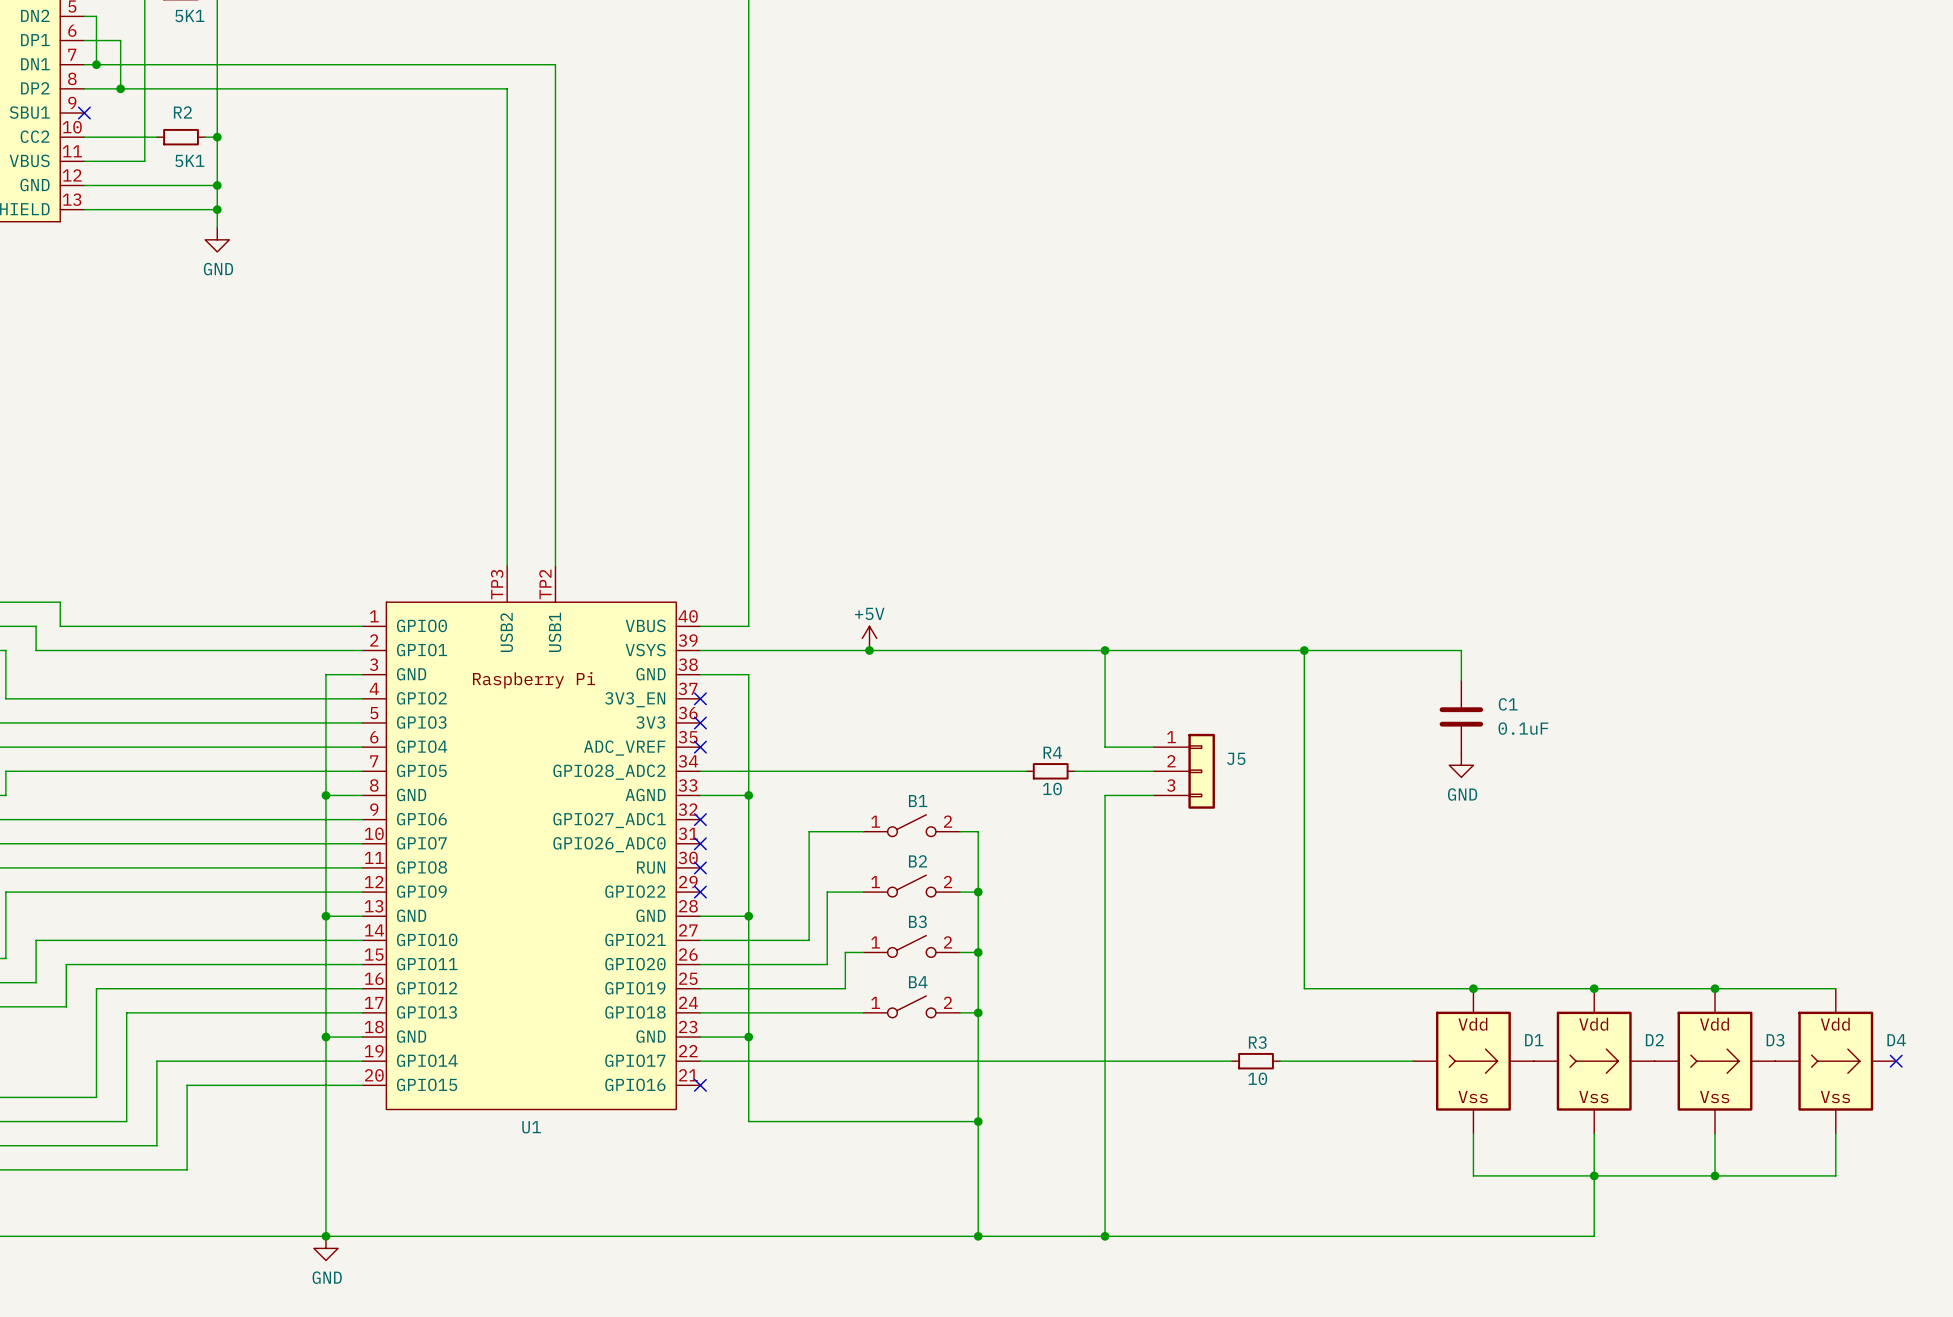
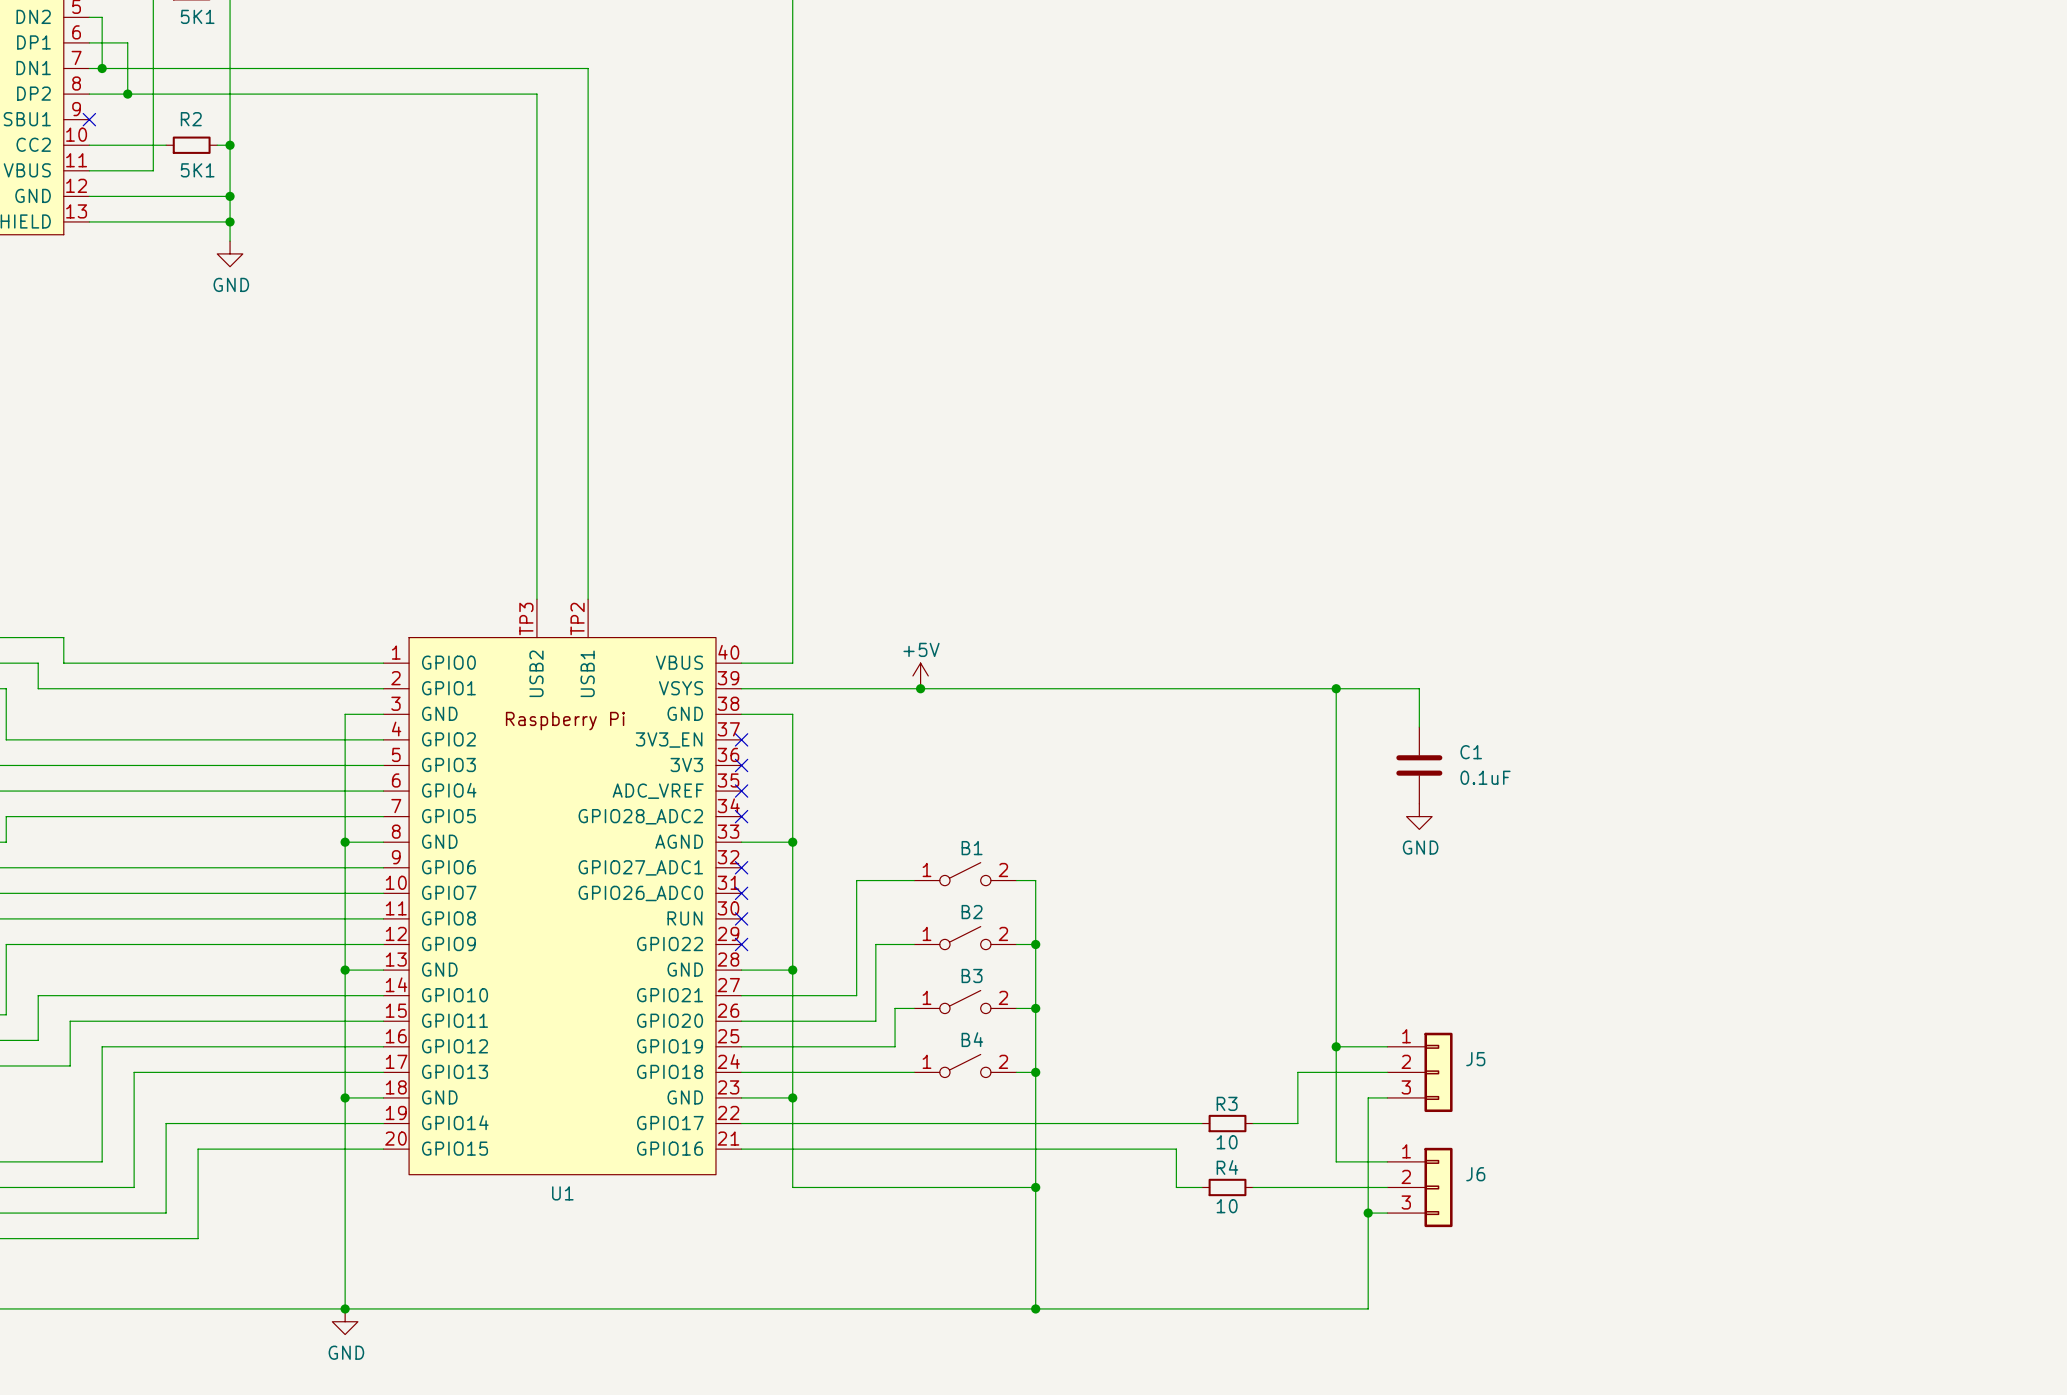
wire: (1105, 650) (1105, 747) (1153, 747) -> none
junction: (1105, 650) -> none
wire: none -> (1336, 688) (1336, 1161) (1387, 1161)
wire: (1304, 650) (1304, 988) -> (1336, 1046) (1380, 1046)
junction position: (1304, 650) -> (1336, 688)
wire: (1340, 650) (1461, 650) (1461, 680) -> (1419, 688) (1419, 727)
C1 position: (1461, 716) -> (1419, 765)
power symbol position: GND (1461, 765) -> GND (1419, 816)
wire: (700, 771) (1026, 771) -> none
no-connect mark: none -> (741, 816)
R4 position: (1050, 771) -> (1227, 1187)
wire: (1074, 771) (1153, 771) -> none
J5 position: (1184, 771) -> (1419, 1072)
wire: (1153, 795) (1105, 795) (1105, 1236) -> none
junction: none -> (1336, 1046)
wire: (1310, 988) (1835, 988) -> none
junction: (1473, 988) -> none
junction: (1594, 988) -> none
junction: (1715, 988) -> none
wire: (1135, 1061) (1183, 1061) -> none
wire: (1225, 1061) (1231, 1061) -> (1297, 1123) (1297, 1072) (1387, 1072)
R3 position: (1256, 1061) -> (1227, 1123)
wire: (1280, 1061) (1413, 1061) -> none
D1: (1473, 1061) -> none
D2: (1594, 1061) -> none
D3: (1715, 1061) -> none
D4: (1835, 1061) -> none
no-connect mark: (1896, 1061) -> none
wire: none -> (741, 1149) (1176, 1149) (1176, 1187) (1201, 1187)
no-connect mark: (700, 1085) -> none
wire: none -> (1253, 1187) (1387, 1187)
J6: none -> (1419, 1187)
wire: (1473, 1133) (1473, 1175) (1835, 1175) (1835, 1133) -> none
wire: (1594, 1133) (1594, 1236) (1292, 1236) -> (1387, 1097) (1368, 1097) (1368, 1308)
wire: (1715, 1133) (1715, 1175) -> none
wire: none -> (1368, 1213) (1387, 1213)
junction: none -> (1368, 1213)
junction: (1594, 1175) -> none
junction: (1715, 1175) -> none
junction: (1105, 1236) -> none

